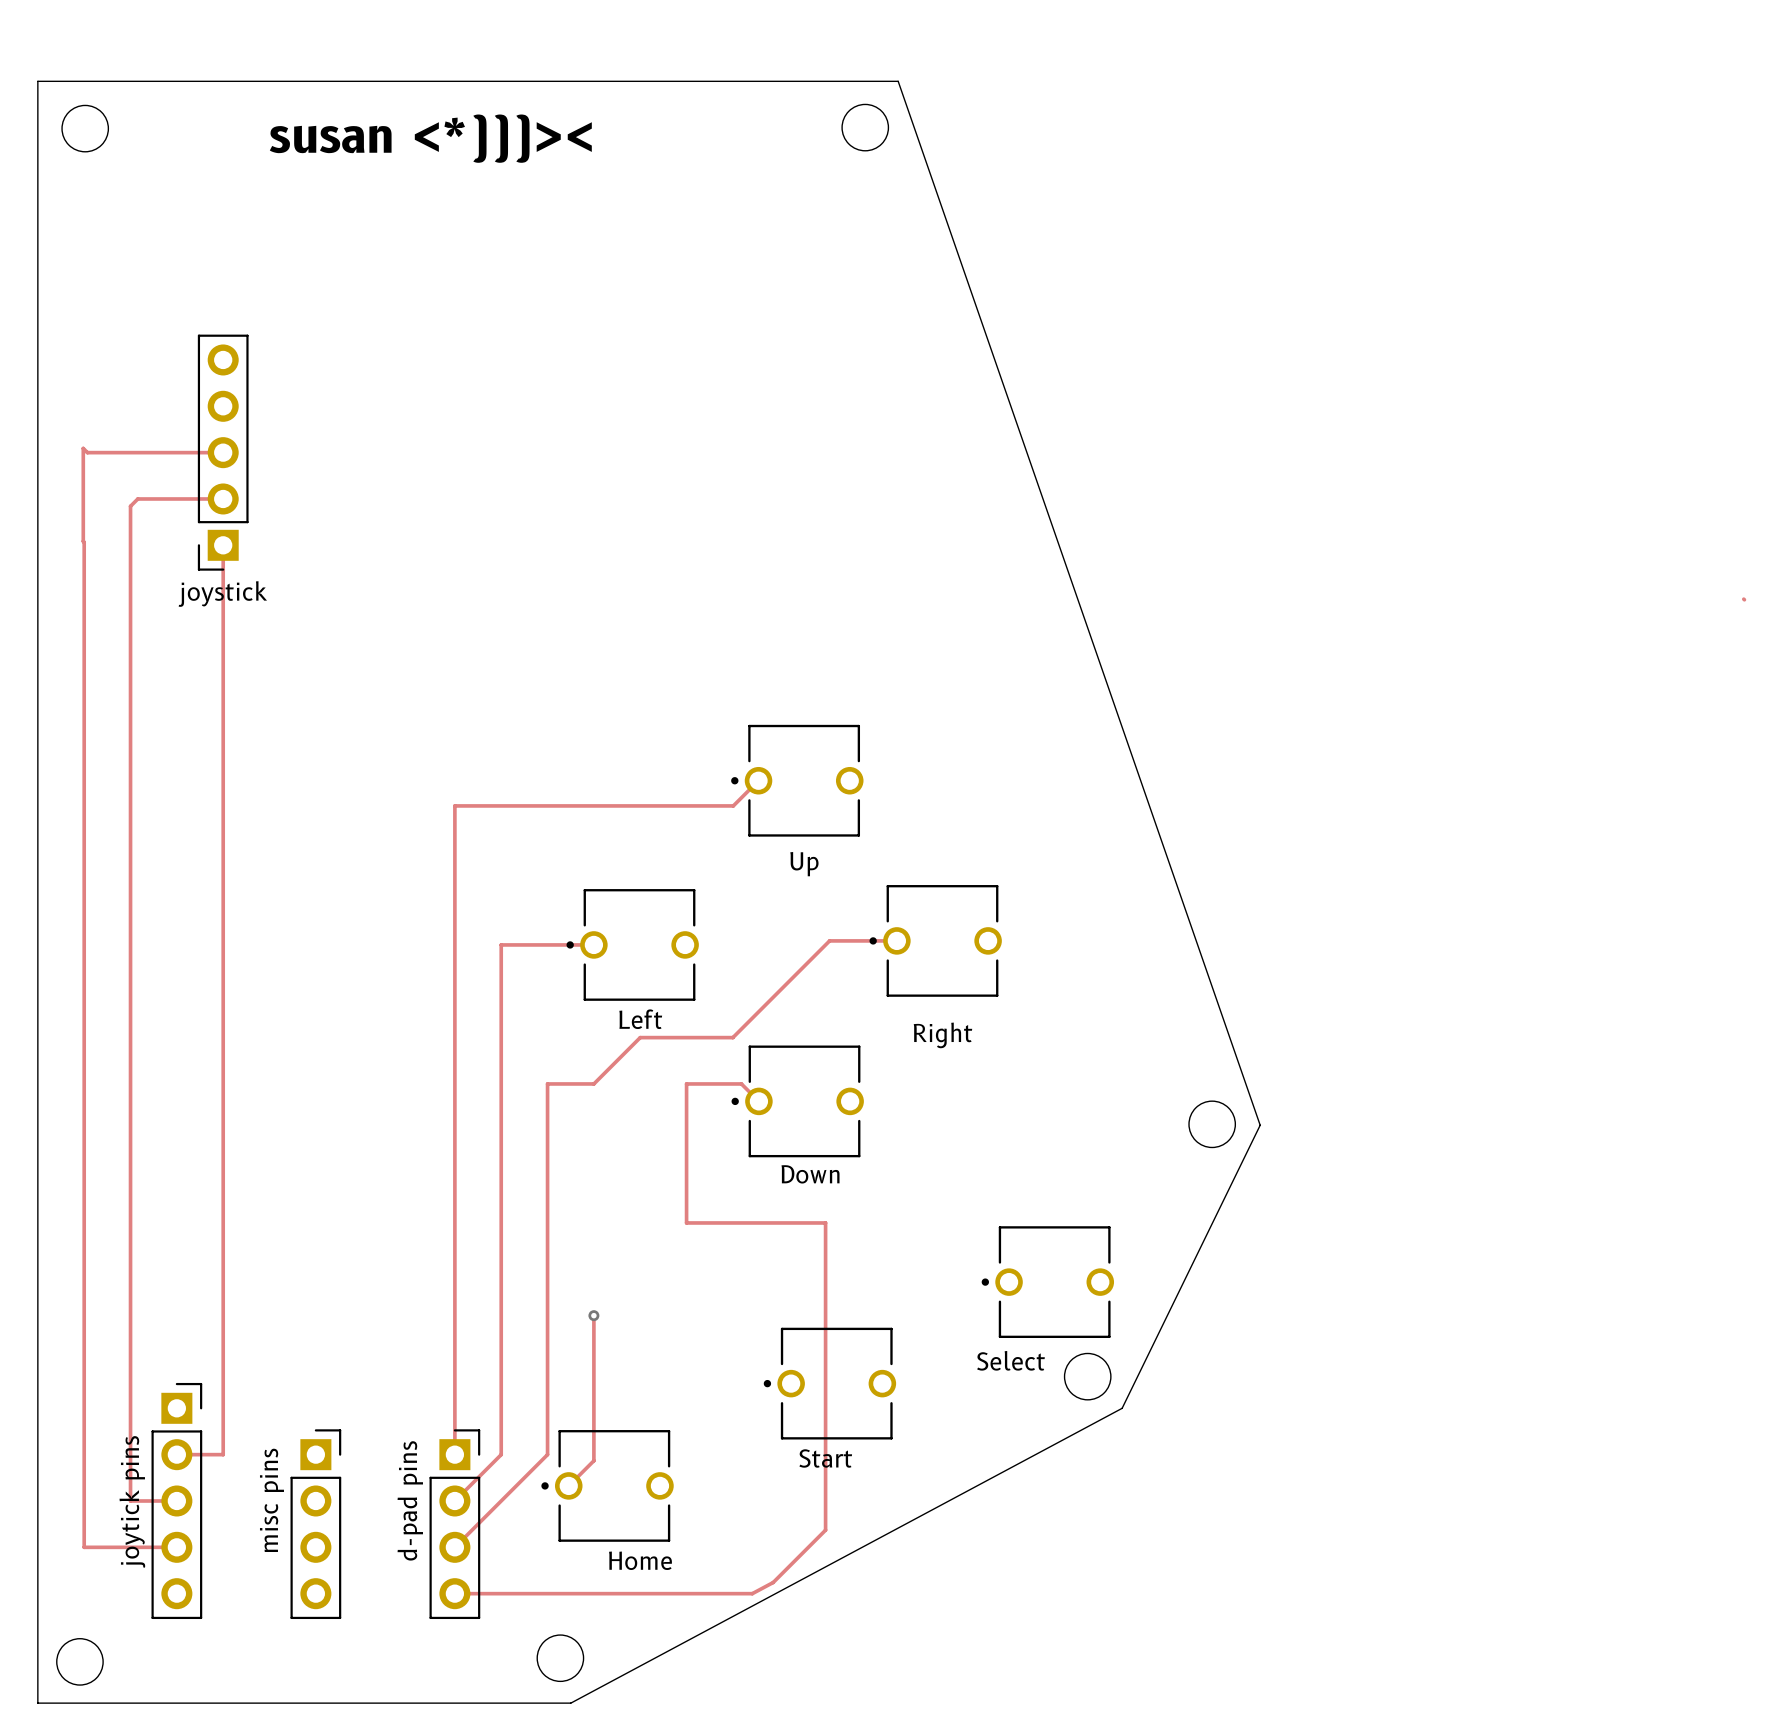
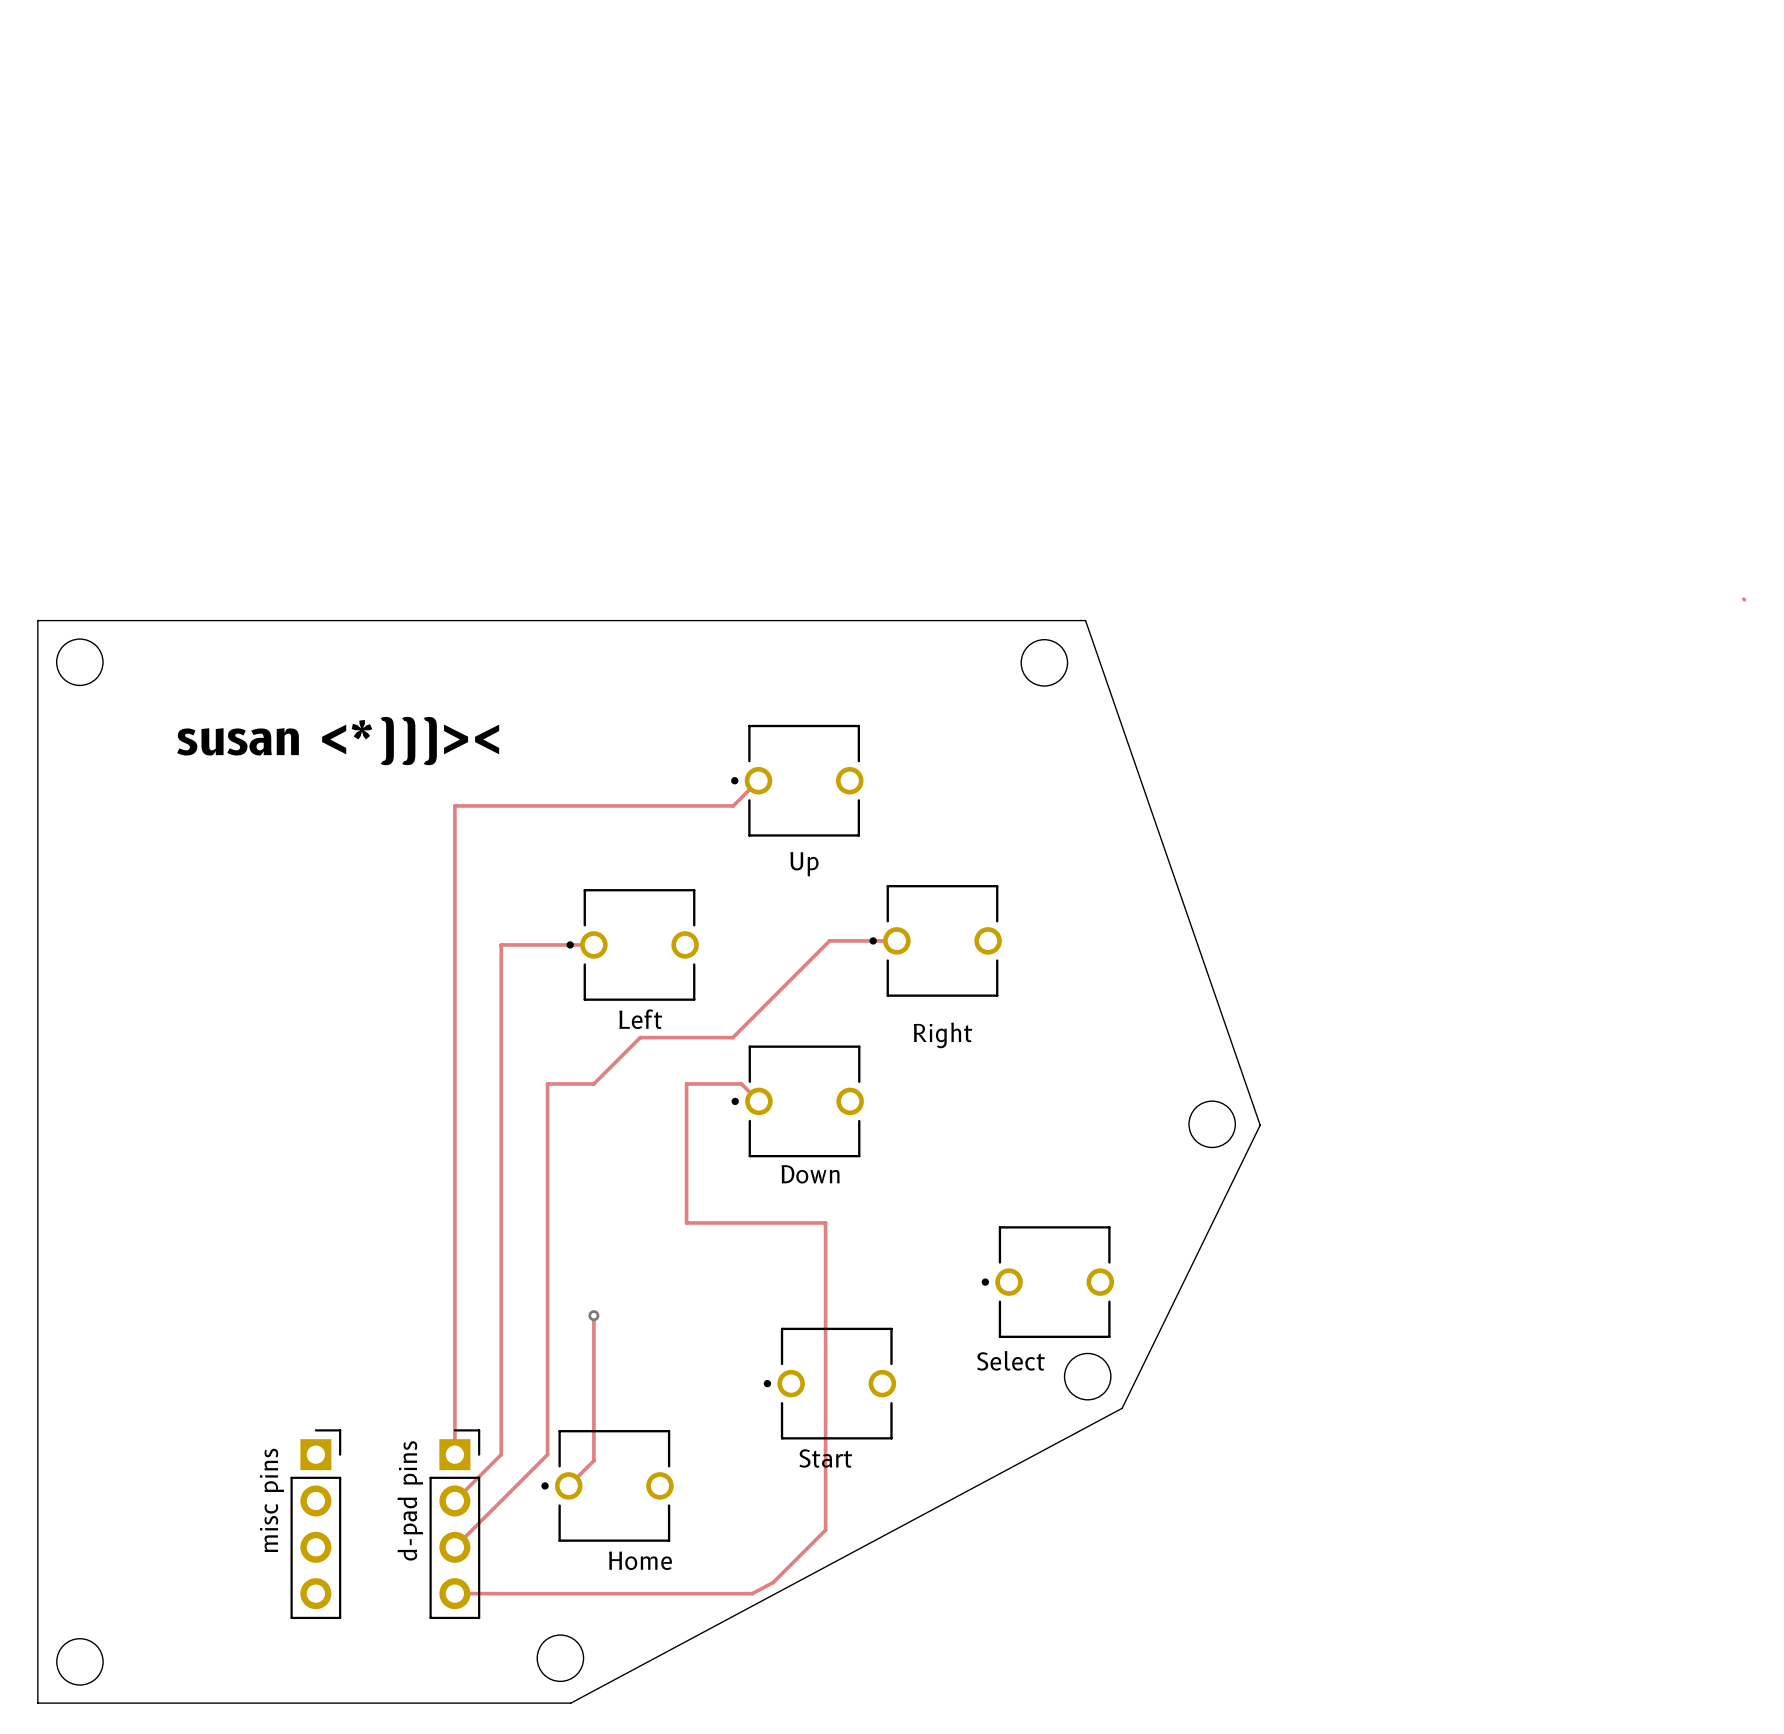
round board edge: [841, 103, 889, 152] -> none
round board edge: [61, 104, 109, 153] -> none
text: susan <*)))>< (430, 138) -> none
track: (223, 452) (87, 452) (83, 448) (84, 1547) (176, 1547) -> none
part: joystick (223, 452) -> none
track: (223, 498) (137, 498) (130, 506) (130, 1500) (176, 1500) -> none
track: (223, 545) (223, 1454) (176, 1454) -> none
board edge: (37, 620) (37, 81) (898, 81) (1260, 1125) -> (37, 620) (1085, 620) (1260, 1125)
round board edge: none -> [56, 638, 104, 686]
round board edge: none -> [1020, 639, 1068, 687]
text: none -> susan <*)))>< (338, 741)
part: joytick pins (176, 1500) -> none

